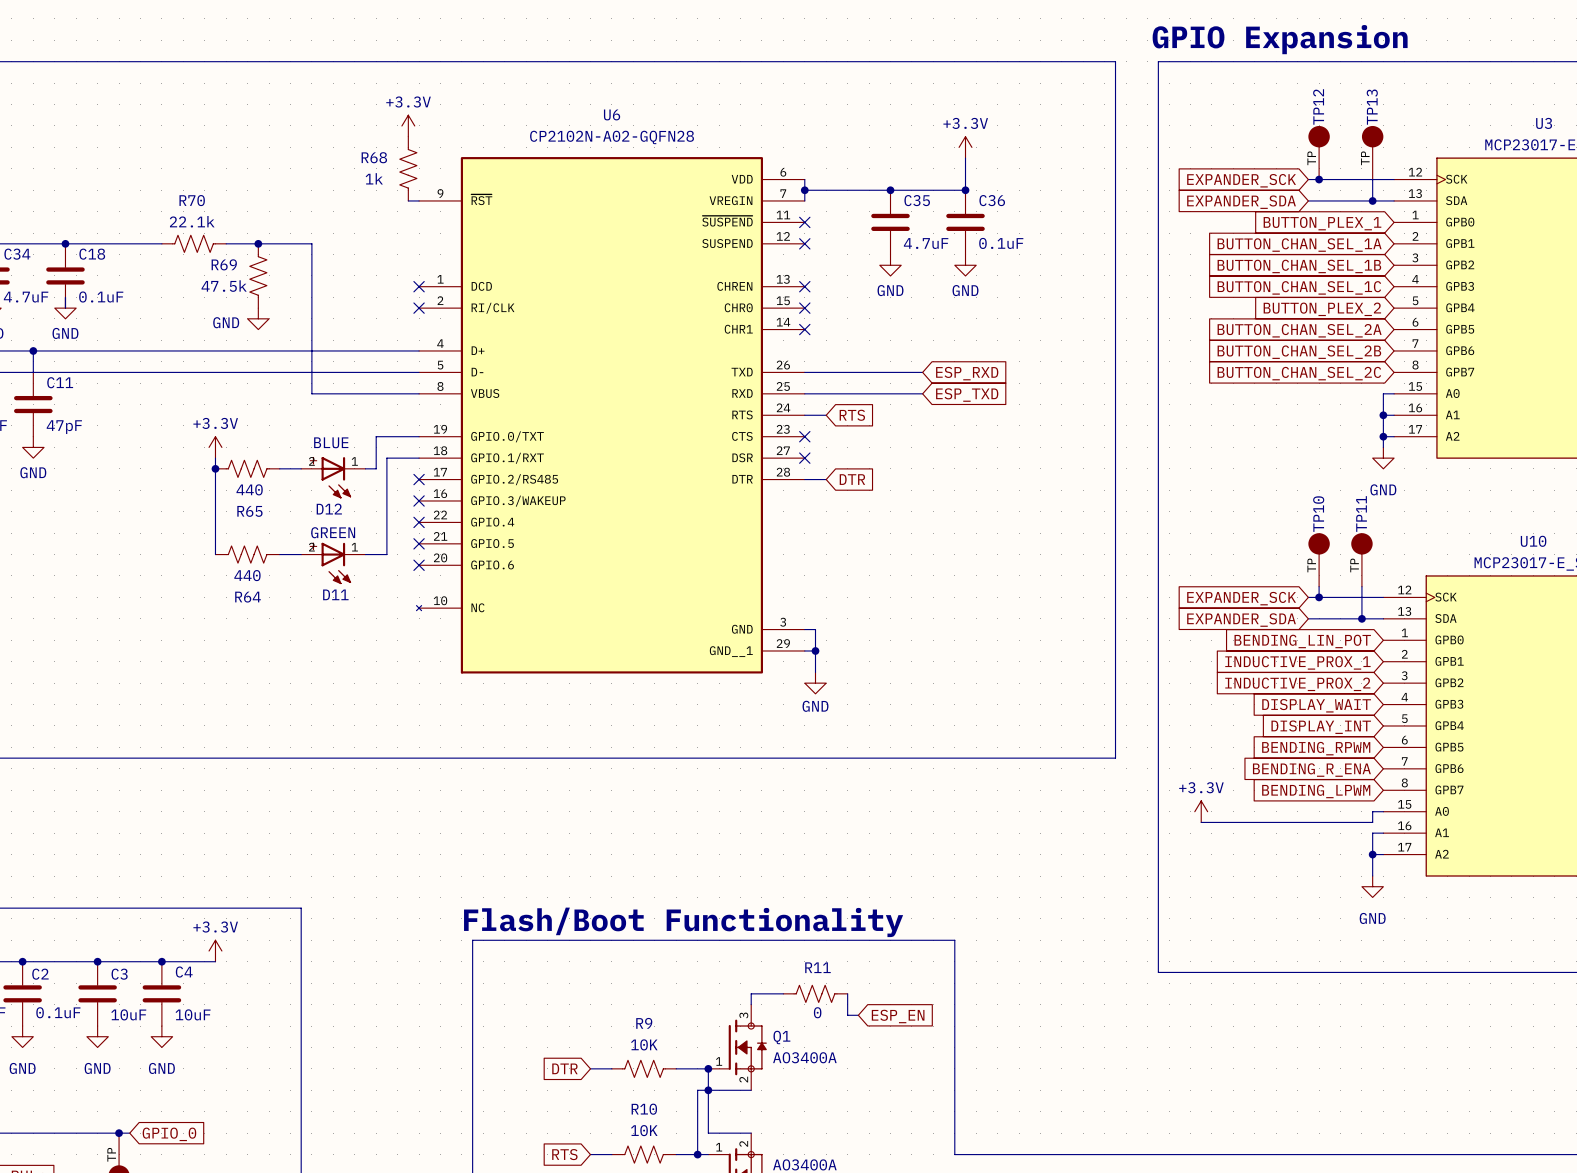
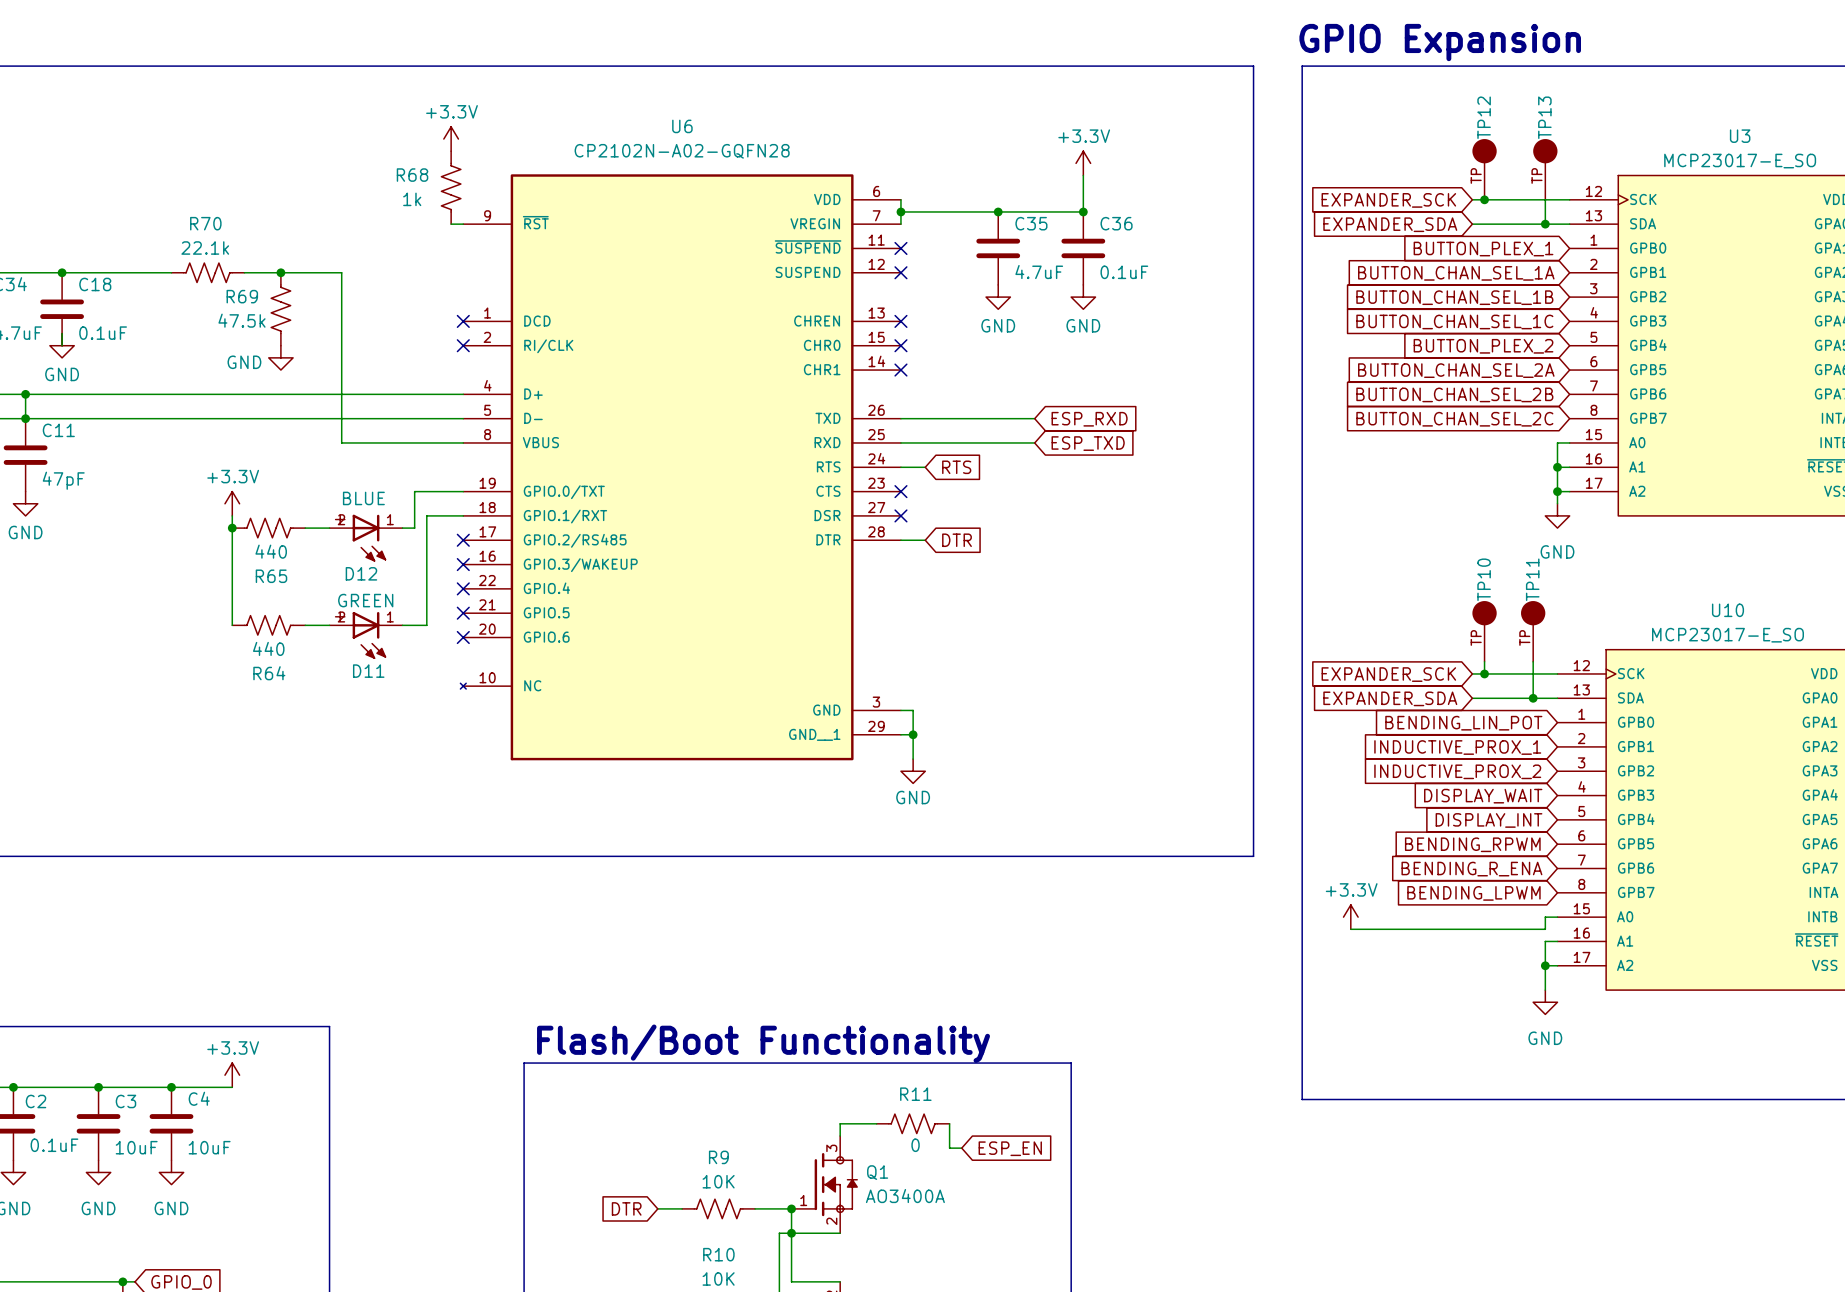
junction: none -> (25, 418)

